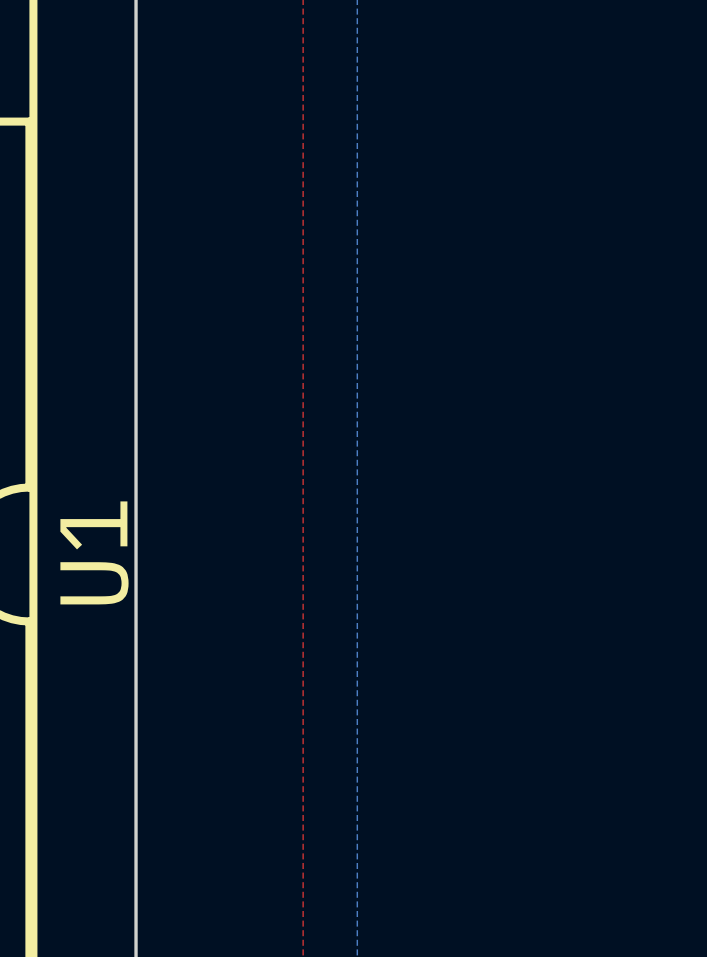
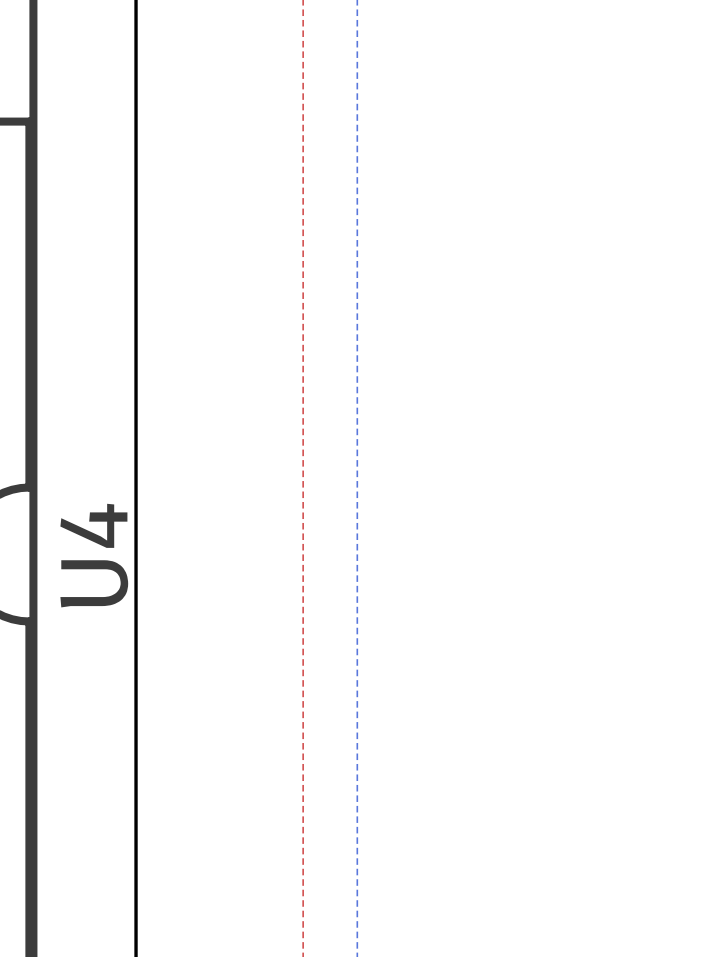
U1 name: U1 (94, 552) -> U4 (94, 555)

